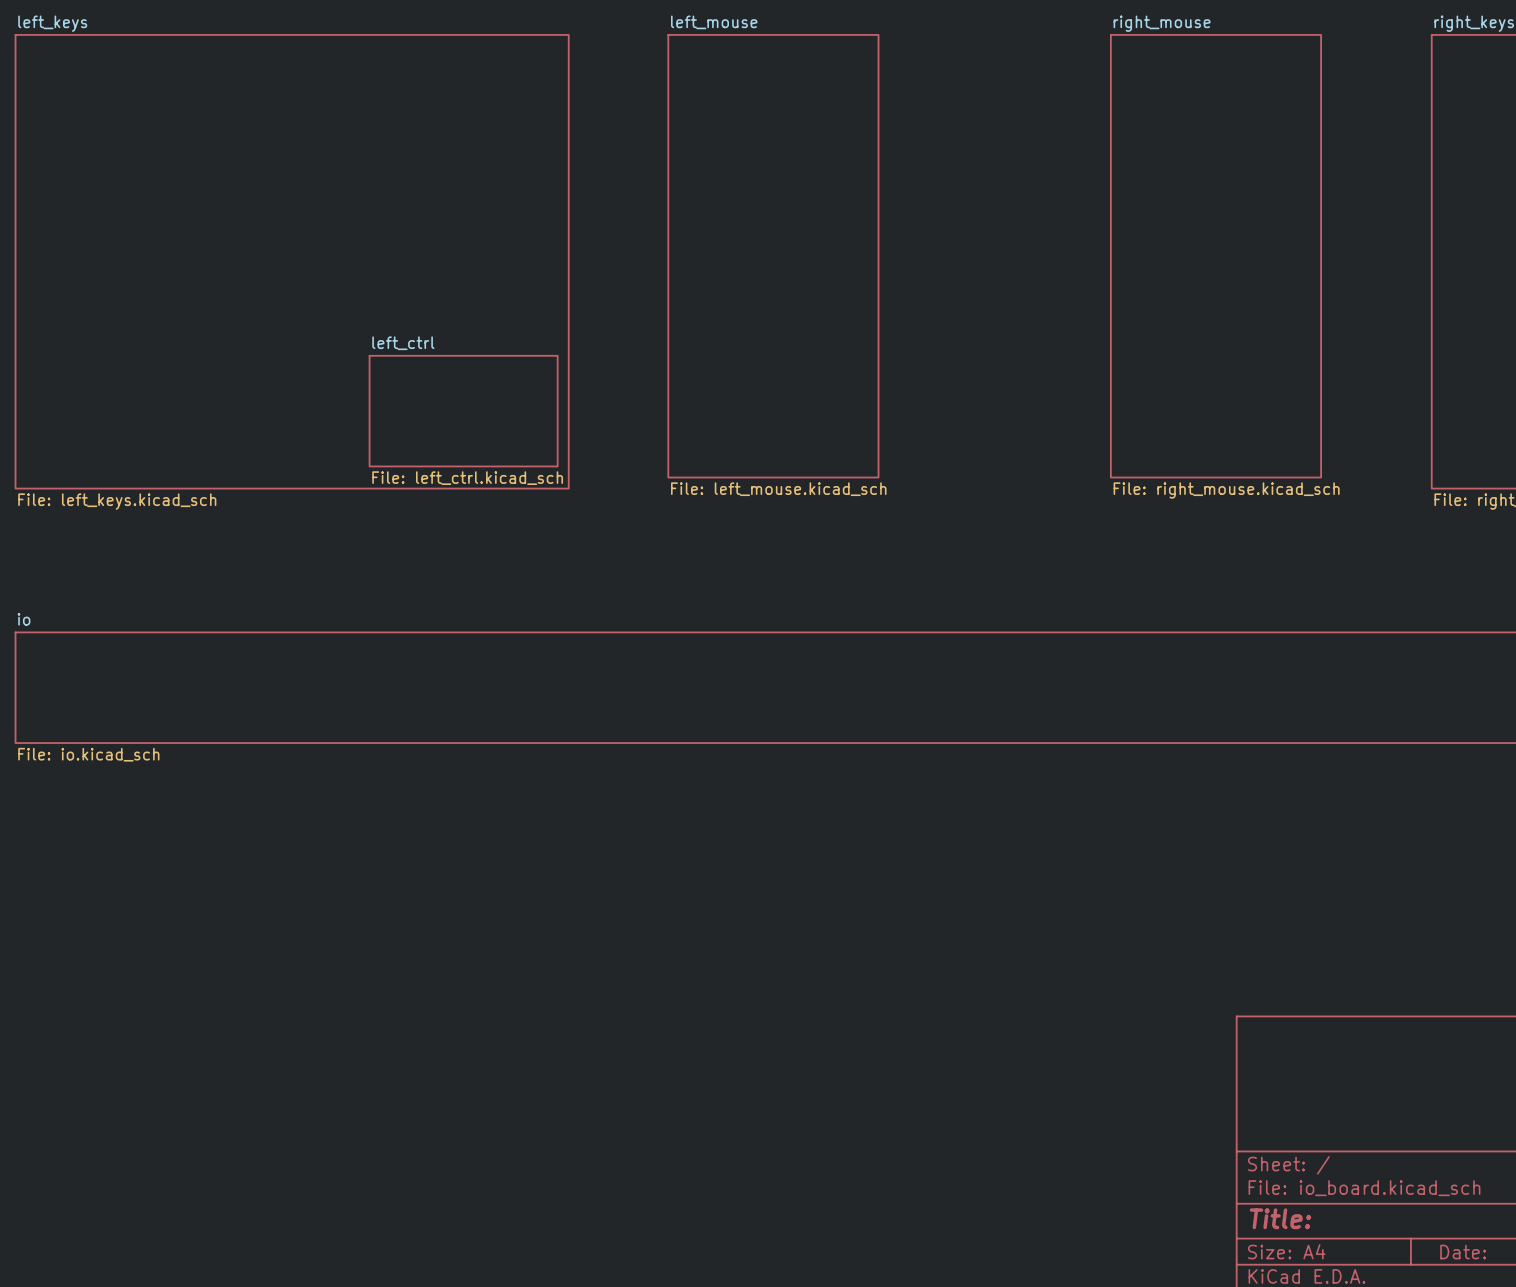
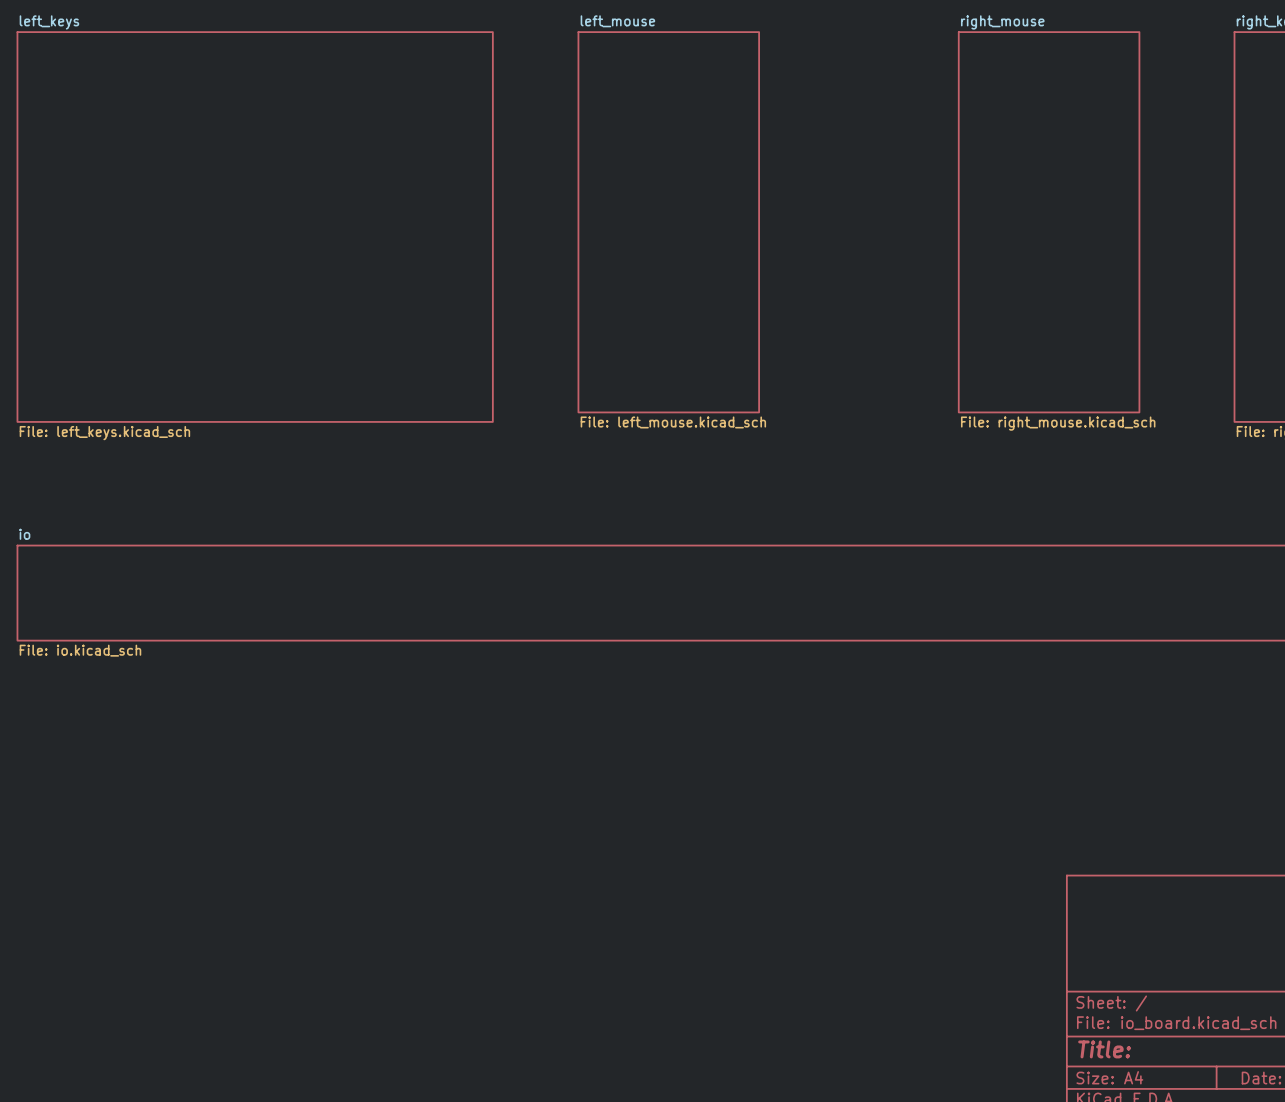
sheet left_ctrl: File: left_ctrl.kicad_sch (463, 411) -> none

